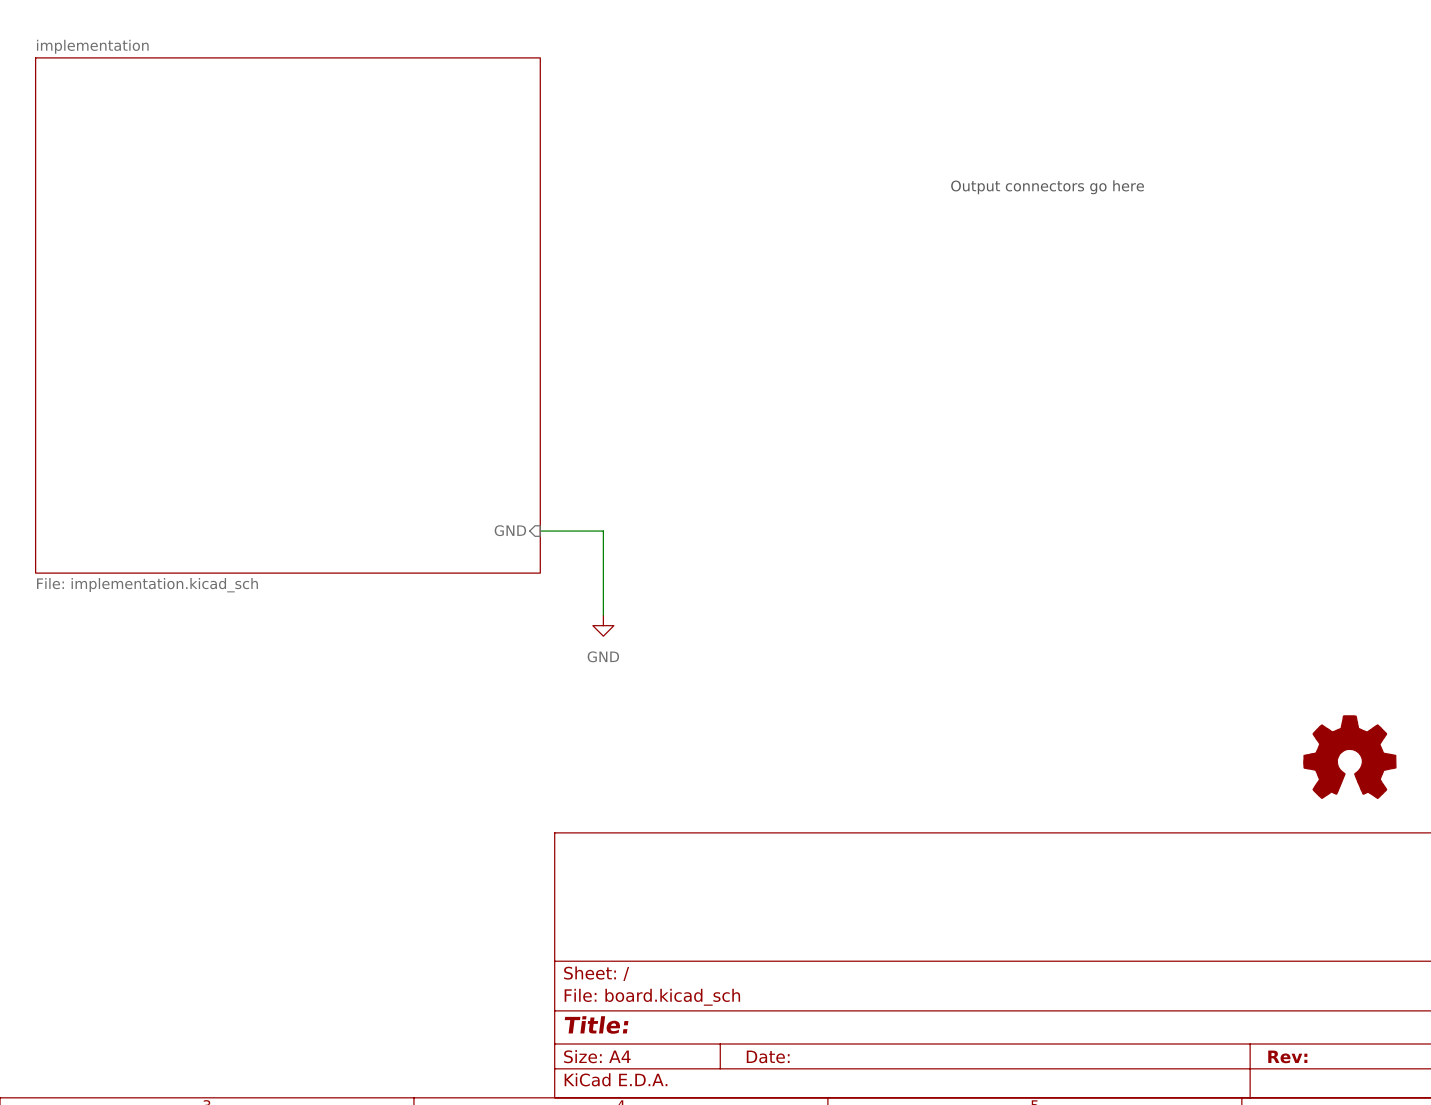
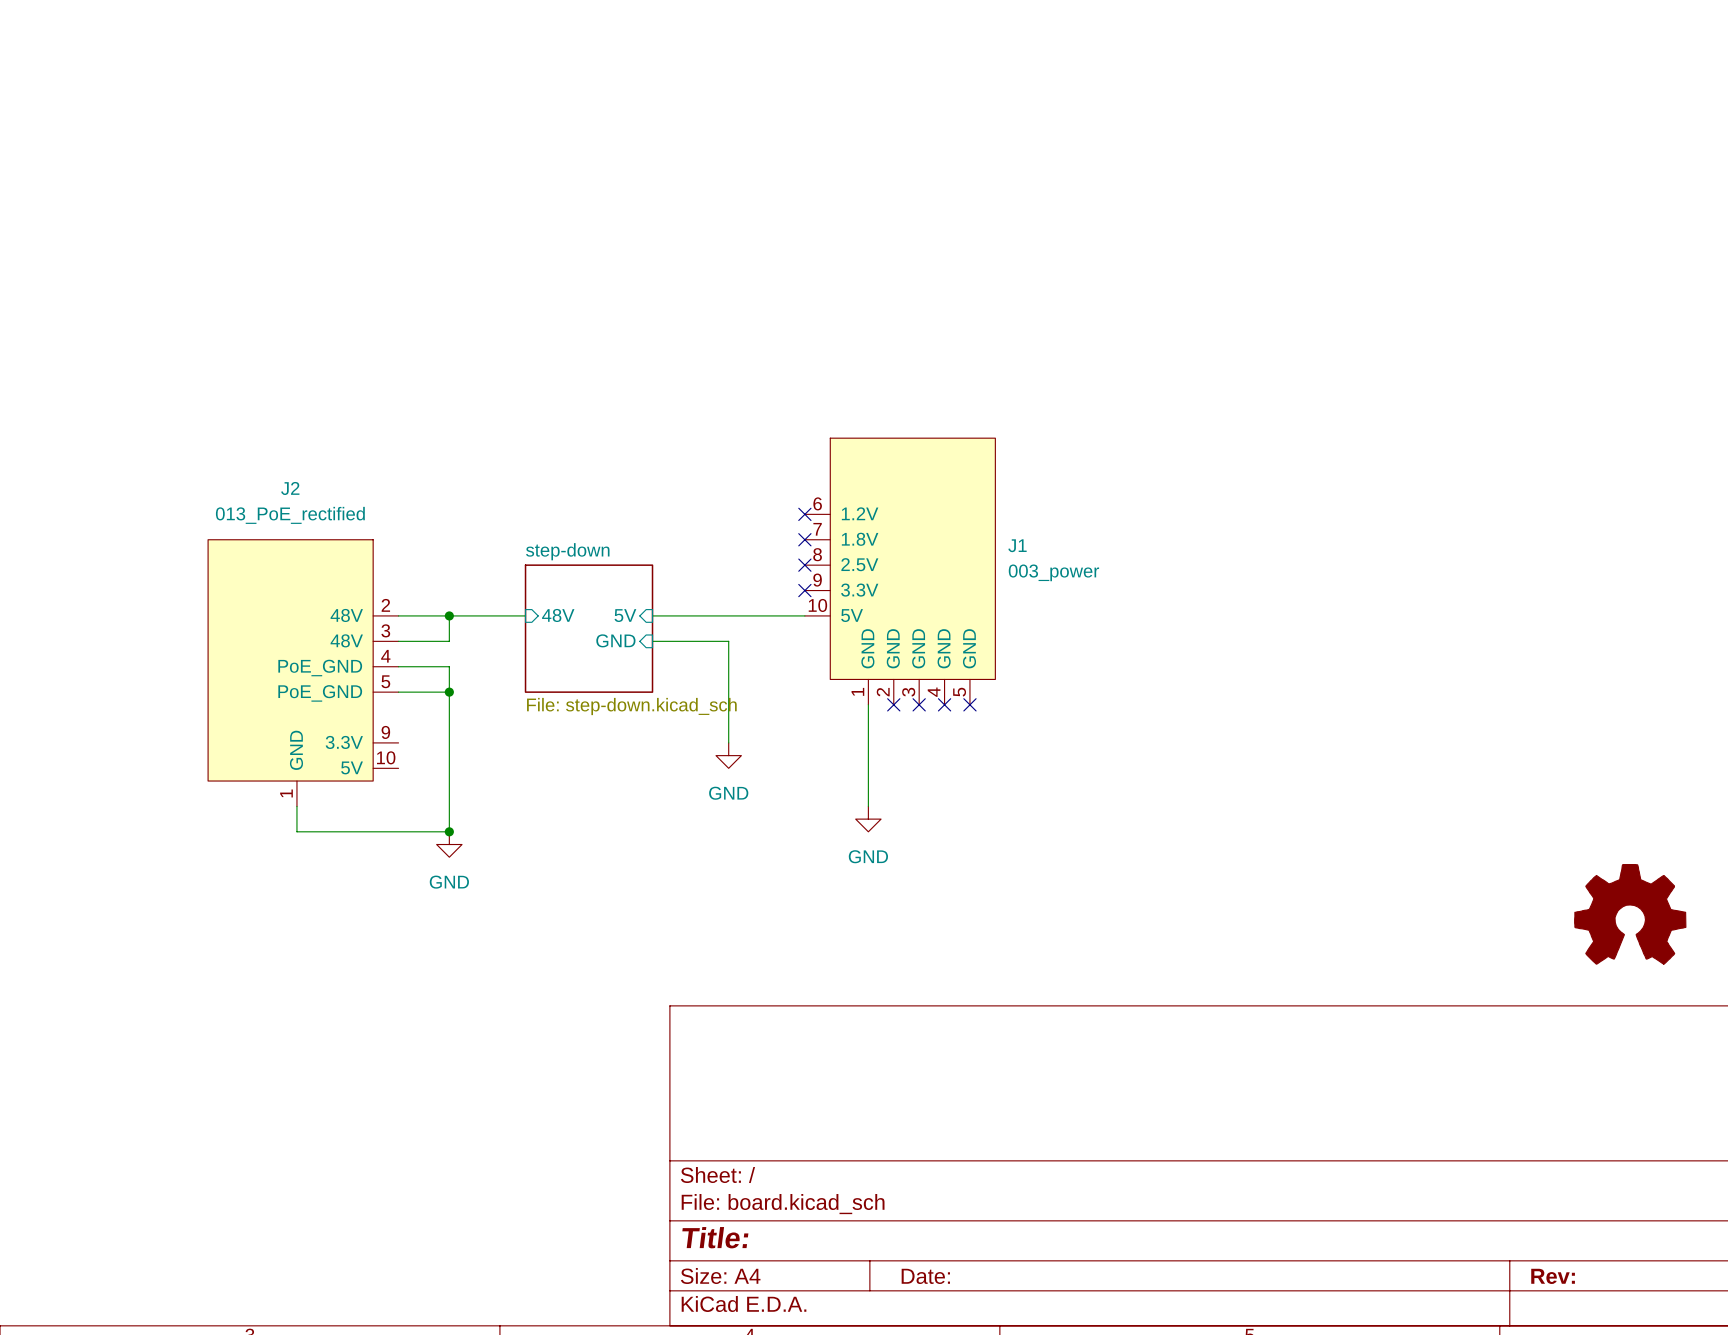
text: Output connectors go here (1047, 187) -> none
sheet implementation: File: implementation.kicad_sch (287, 315) -> none
no-connect mark: none -> (804, 514)
no-connect mark: none -> (804, 539)
no-connect mark: none -> (804, 565)
J1: none -> 003_power (900, 571)
no-connect mark: none -> (804, 590)
sheet pin: none -> 48V (558, 615)
sheet pin: none -> 5V (625, 615)
wire: none -> (398, 615) (525, 615)
wire: none -> (449, 615) (449, 641) (398, 641)
junction: none -> (449, 615)
wire: none -> (652, 615) (804, 615)
sheet step-down: none -> File: step-down.kicad_sch (589, 628)
wire: none -> (398, 666) (449, 666) (449, 831) (296, 831) (296, 806)
J2: none -> 013_PoE_rectified (303, 673)
junction: none -> (449, 692)
wire: none -> (868, 704) (868, 806)
no-connect mark: none -> (893, 704)
no-connect mark: none -> (919, 704)
no-connect mark: none -> (944, 704)
no-connect mark: none -> (969, 704)
power symbol: none -> GND (868, 819)
junction: none -> (449, 831)
power symbol: none -> GND (449, 844)

